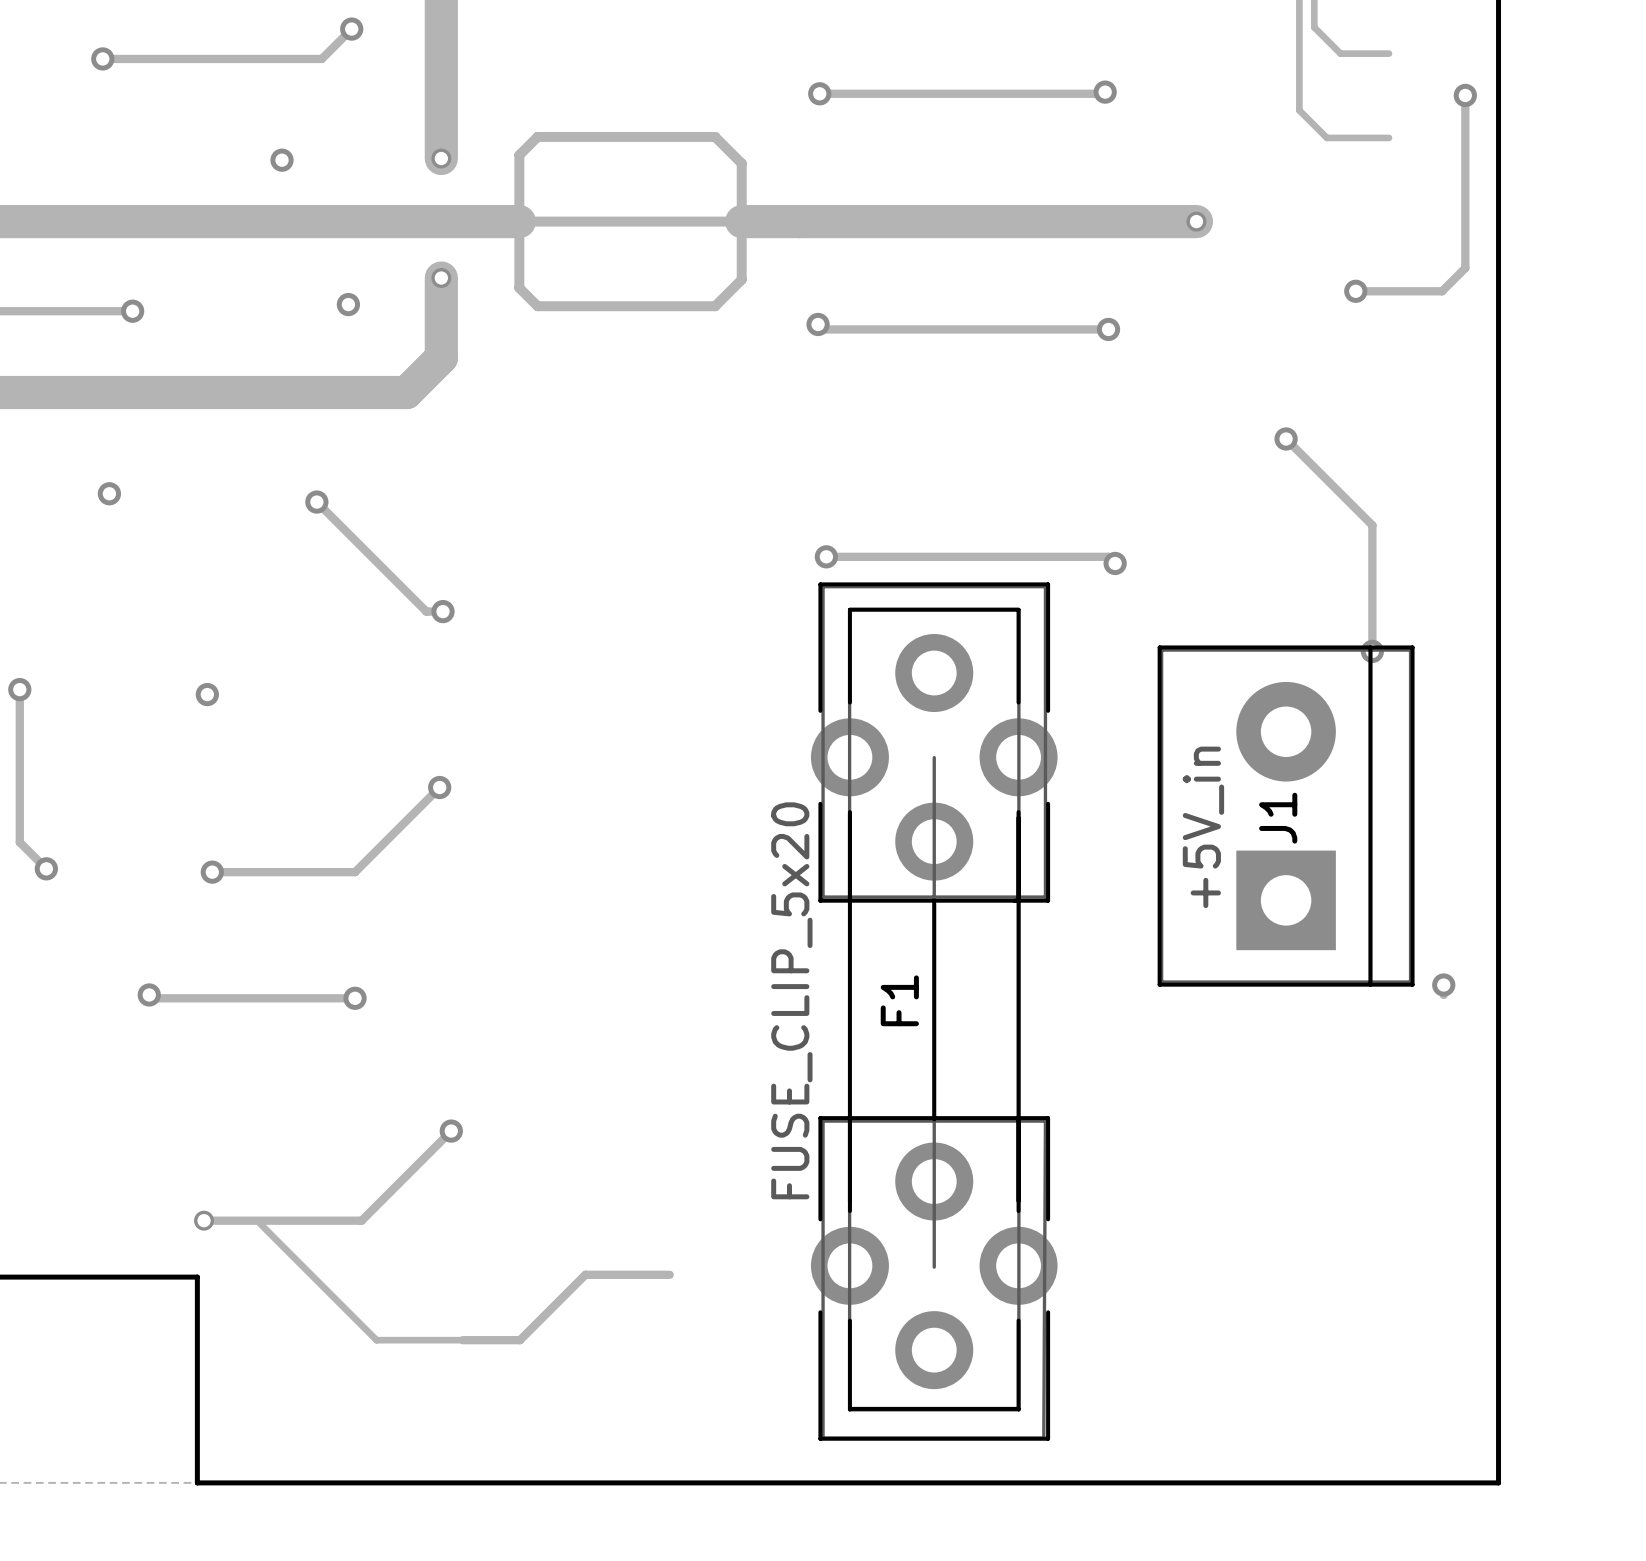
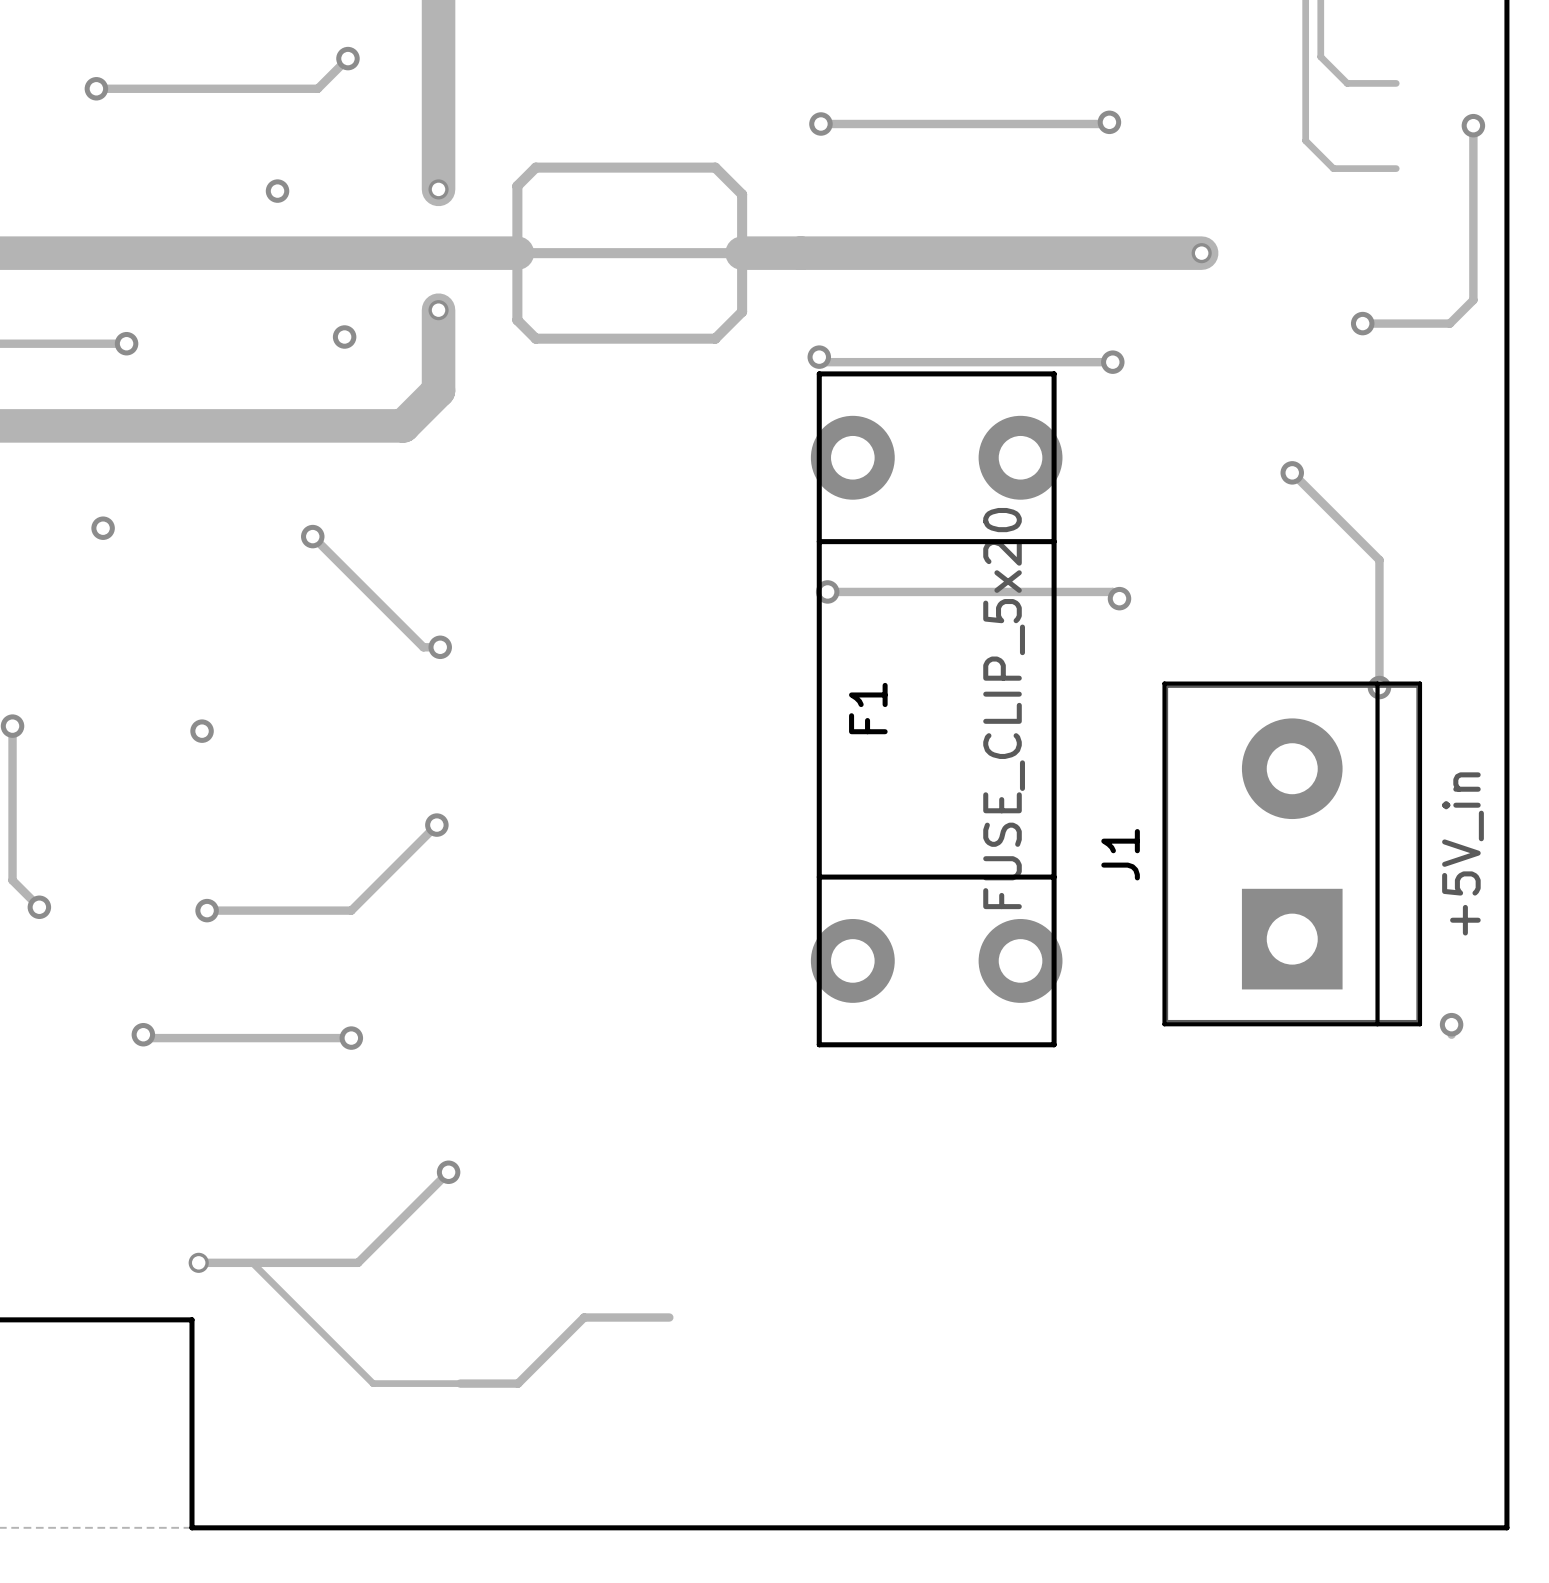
F1 footprint: [810, 582, 1058, 1441] -> [810, 371, 1063, 1048]
J1 name position: J1 (1278, 818) -> J1 (1120, 854)
J1 value position: +5V_in (1203, 827) -> +5V_in (1463, 853)
F1 value position: FUSE_CLIP_5x20 (791, 1000) -> FUSE_CLIP_5x20 (1004, 708)

